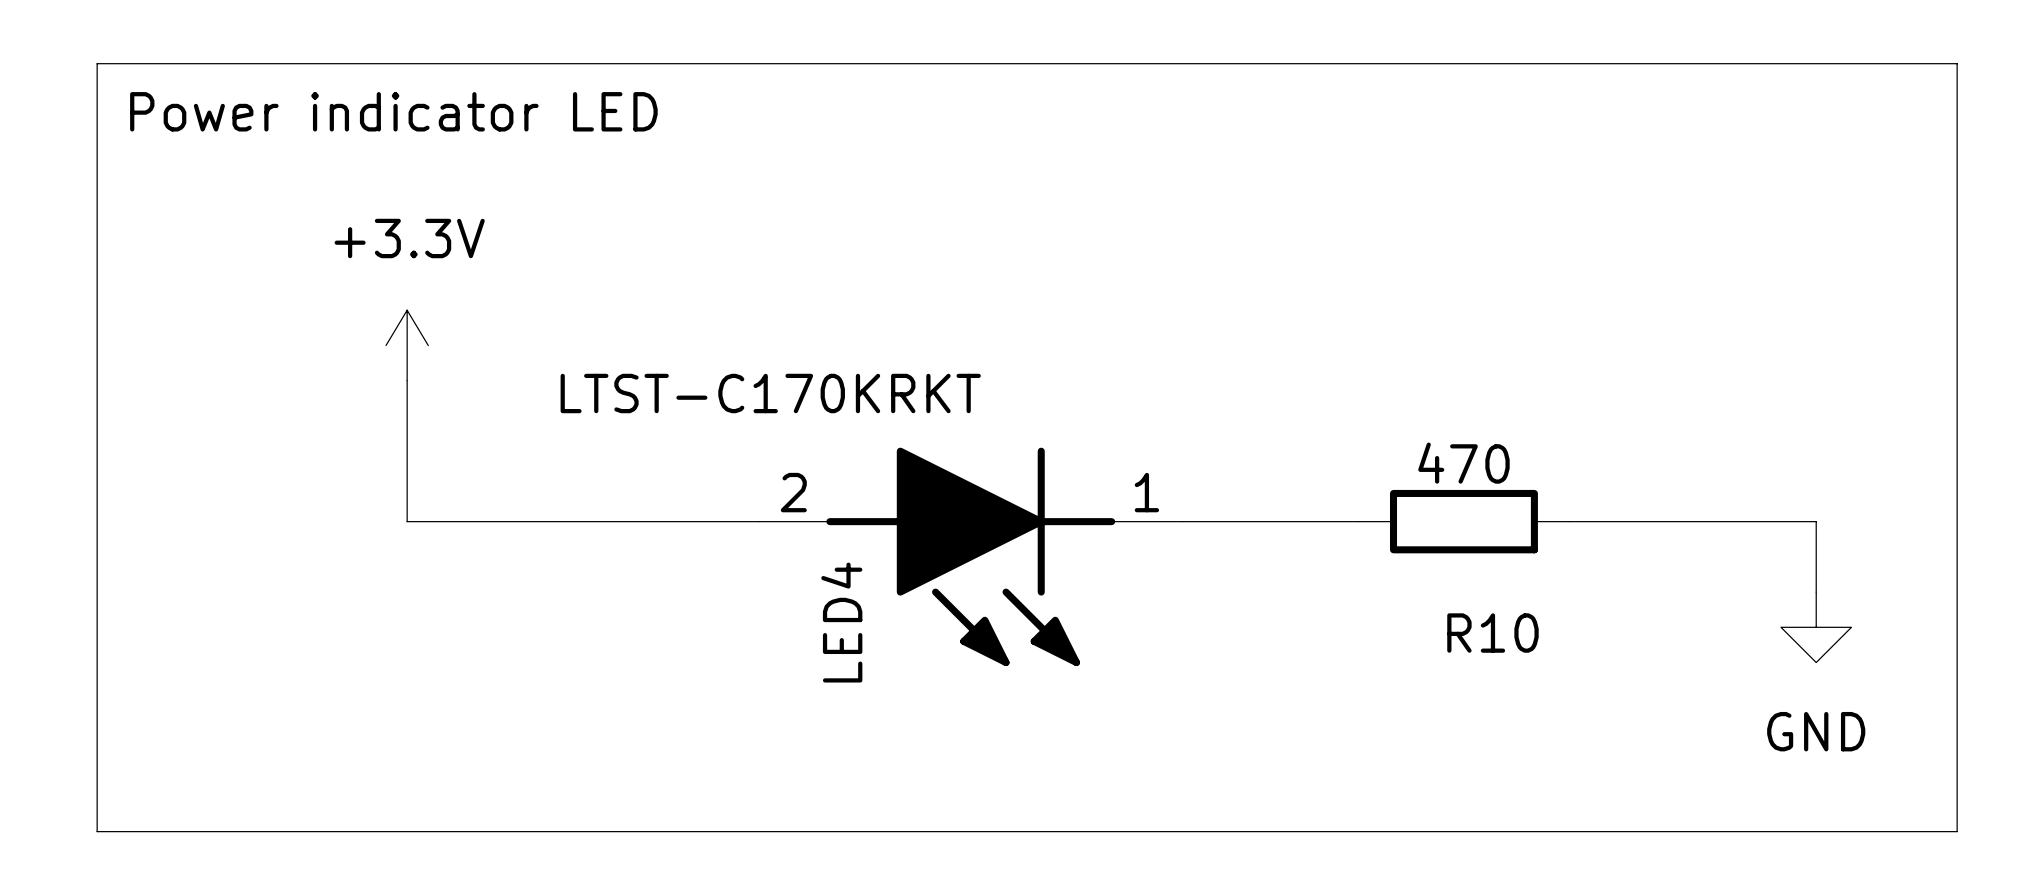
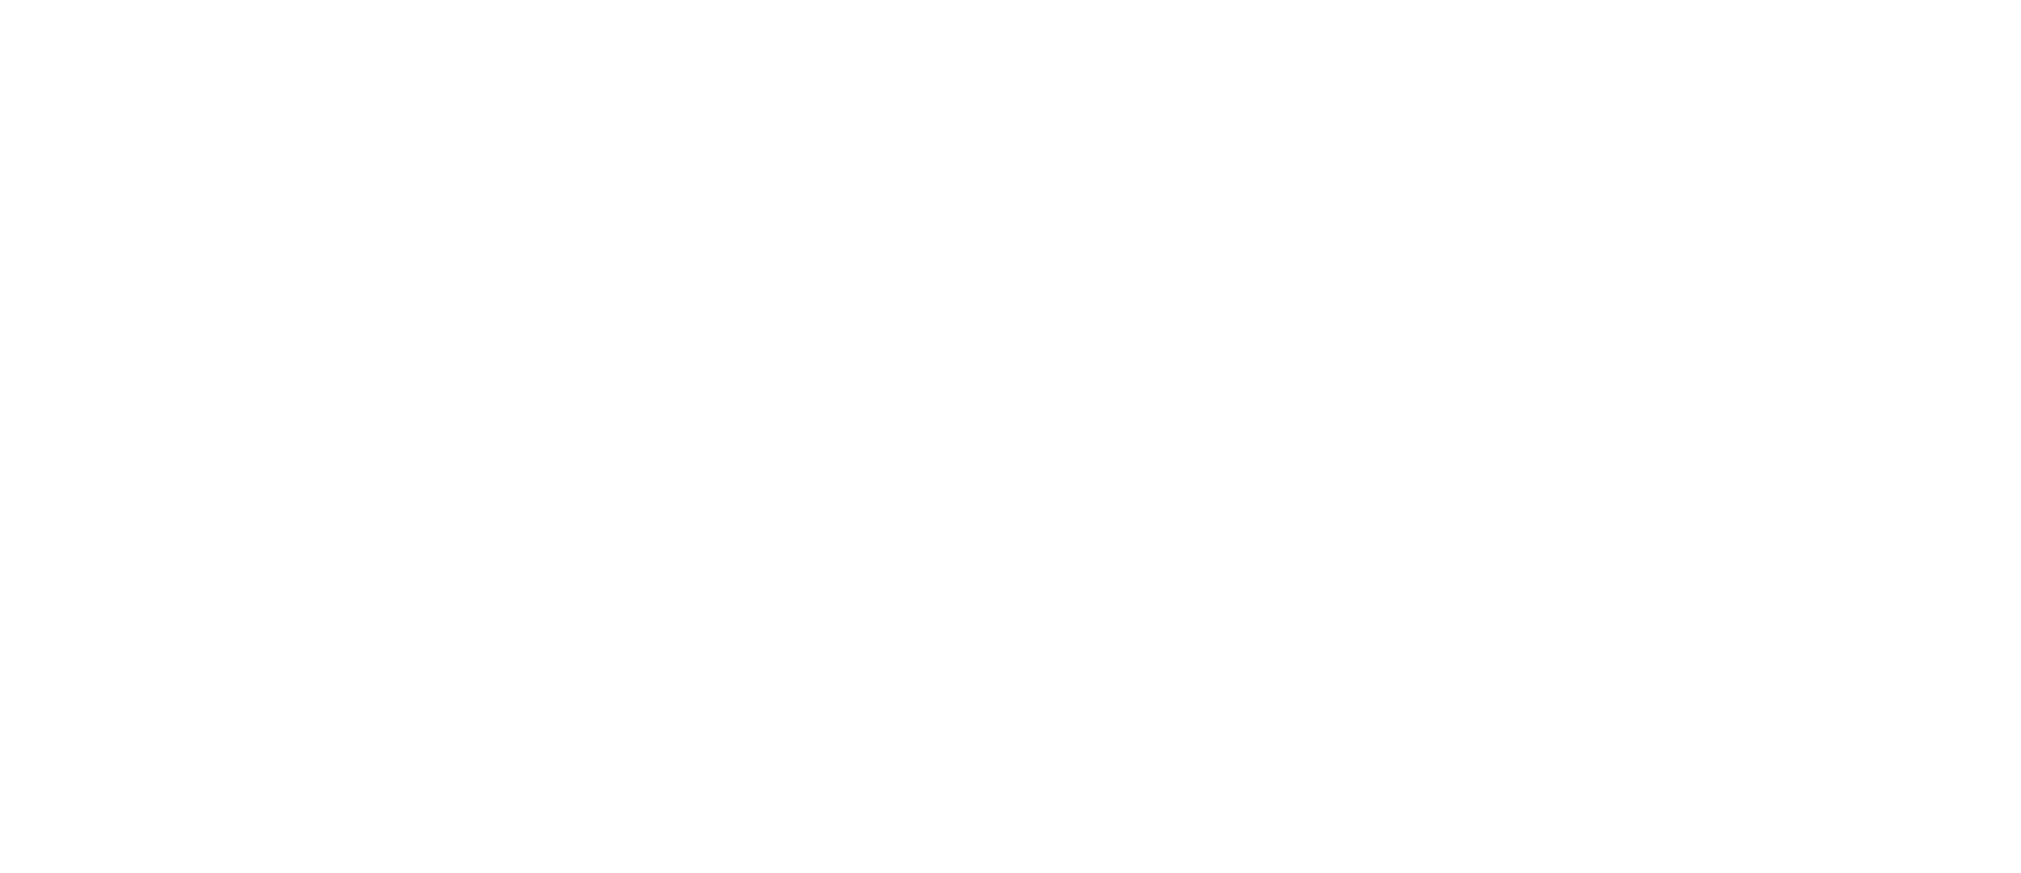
line: (97, 63) (1957, 63) (1957, 831) (97, 831) (97, 63) -> none
text: Power indicator LED (393, 111) -> none
power symbol: +3.3V (407, 345) -> none
wire: (407, 380) (407, 521) (759, 521) -> none
wire: (1182, 521) (1358, 521) -> none
R10: 470 (1463, 521) -> none
wire: (1569, 521) (1816, 521) (1816, 592) -> none
LED4: LTST-C170KRKT (970, 556) -> none
power symbol: GND (1816, 627) -> none

